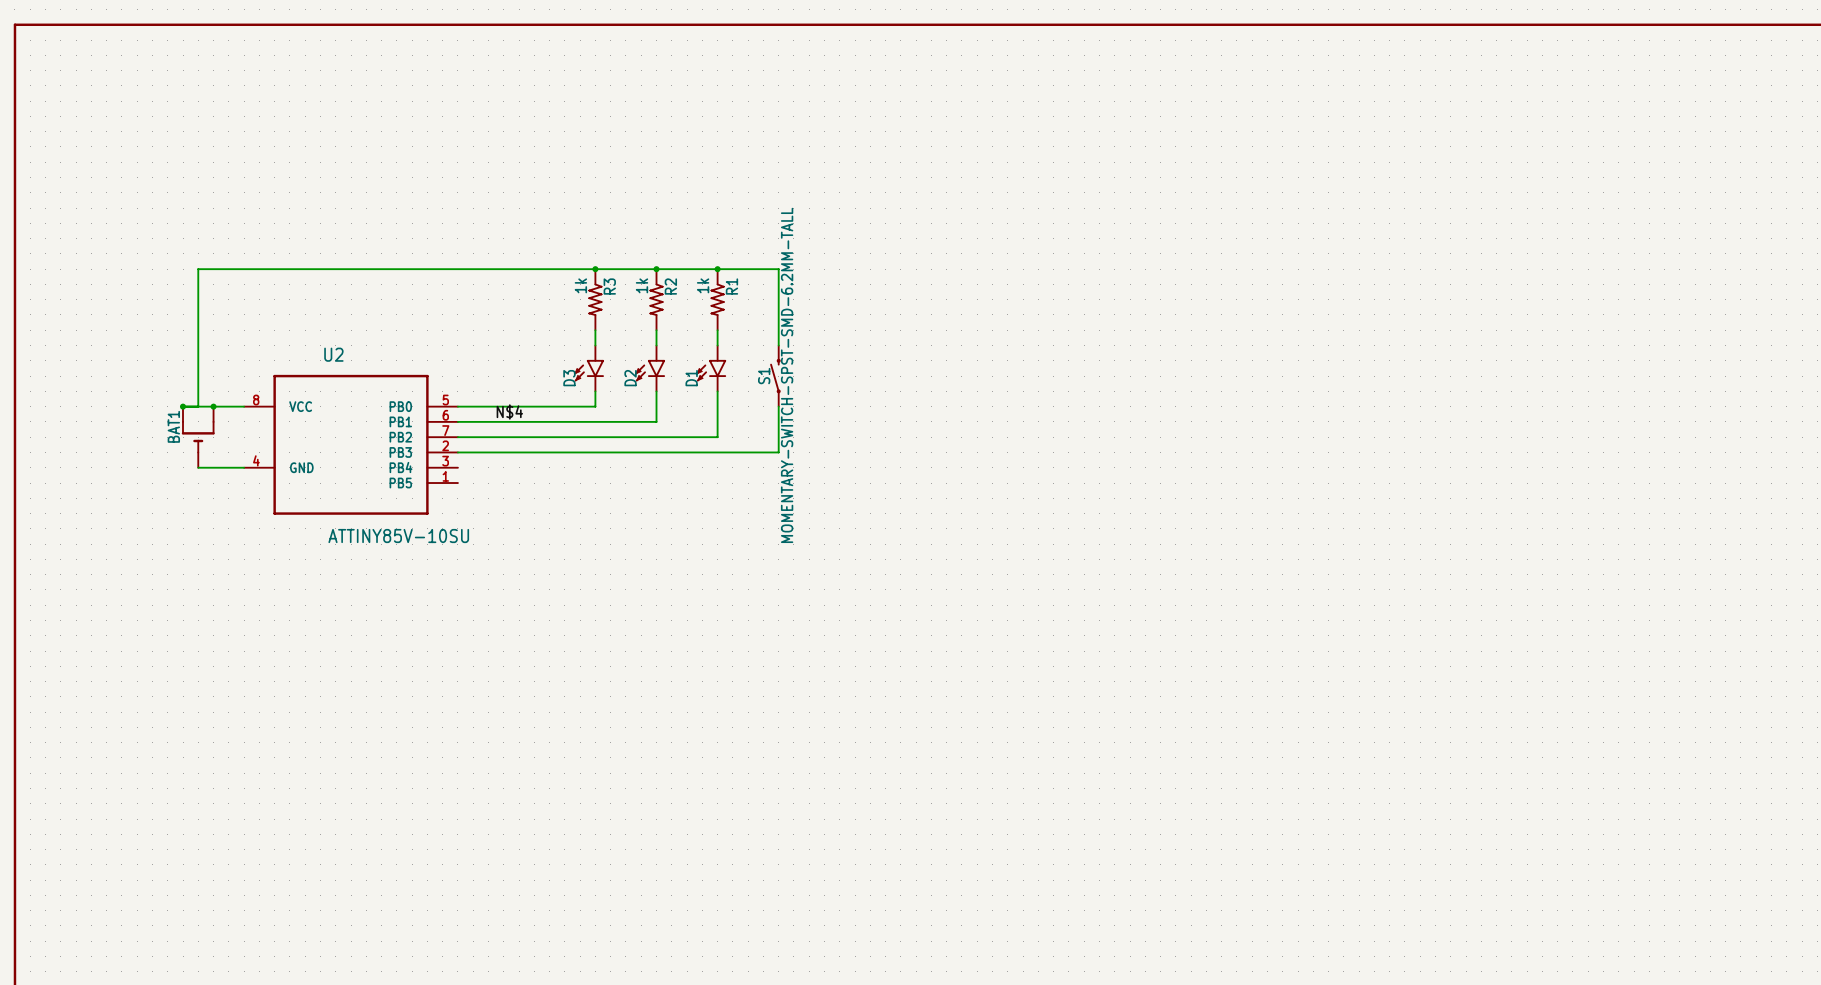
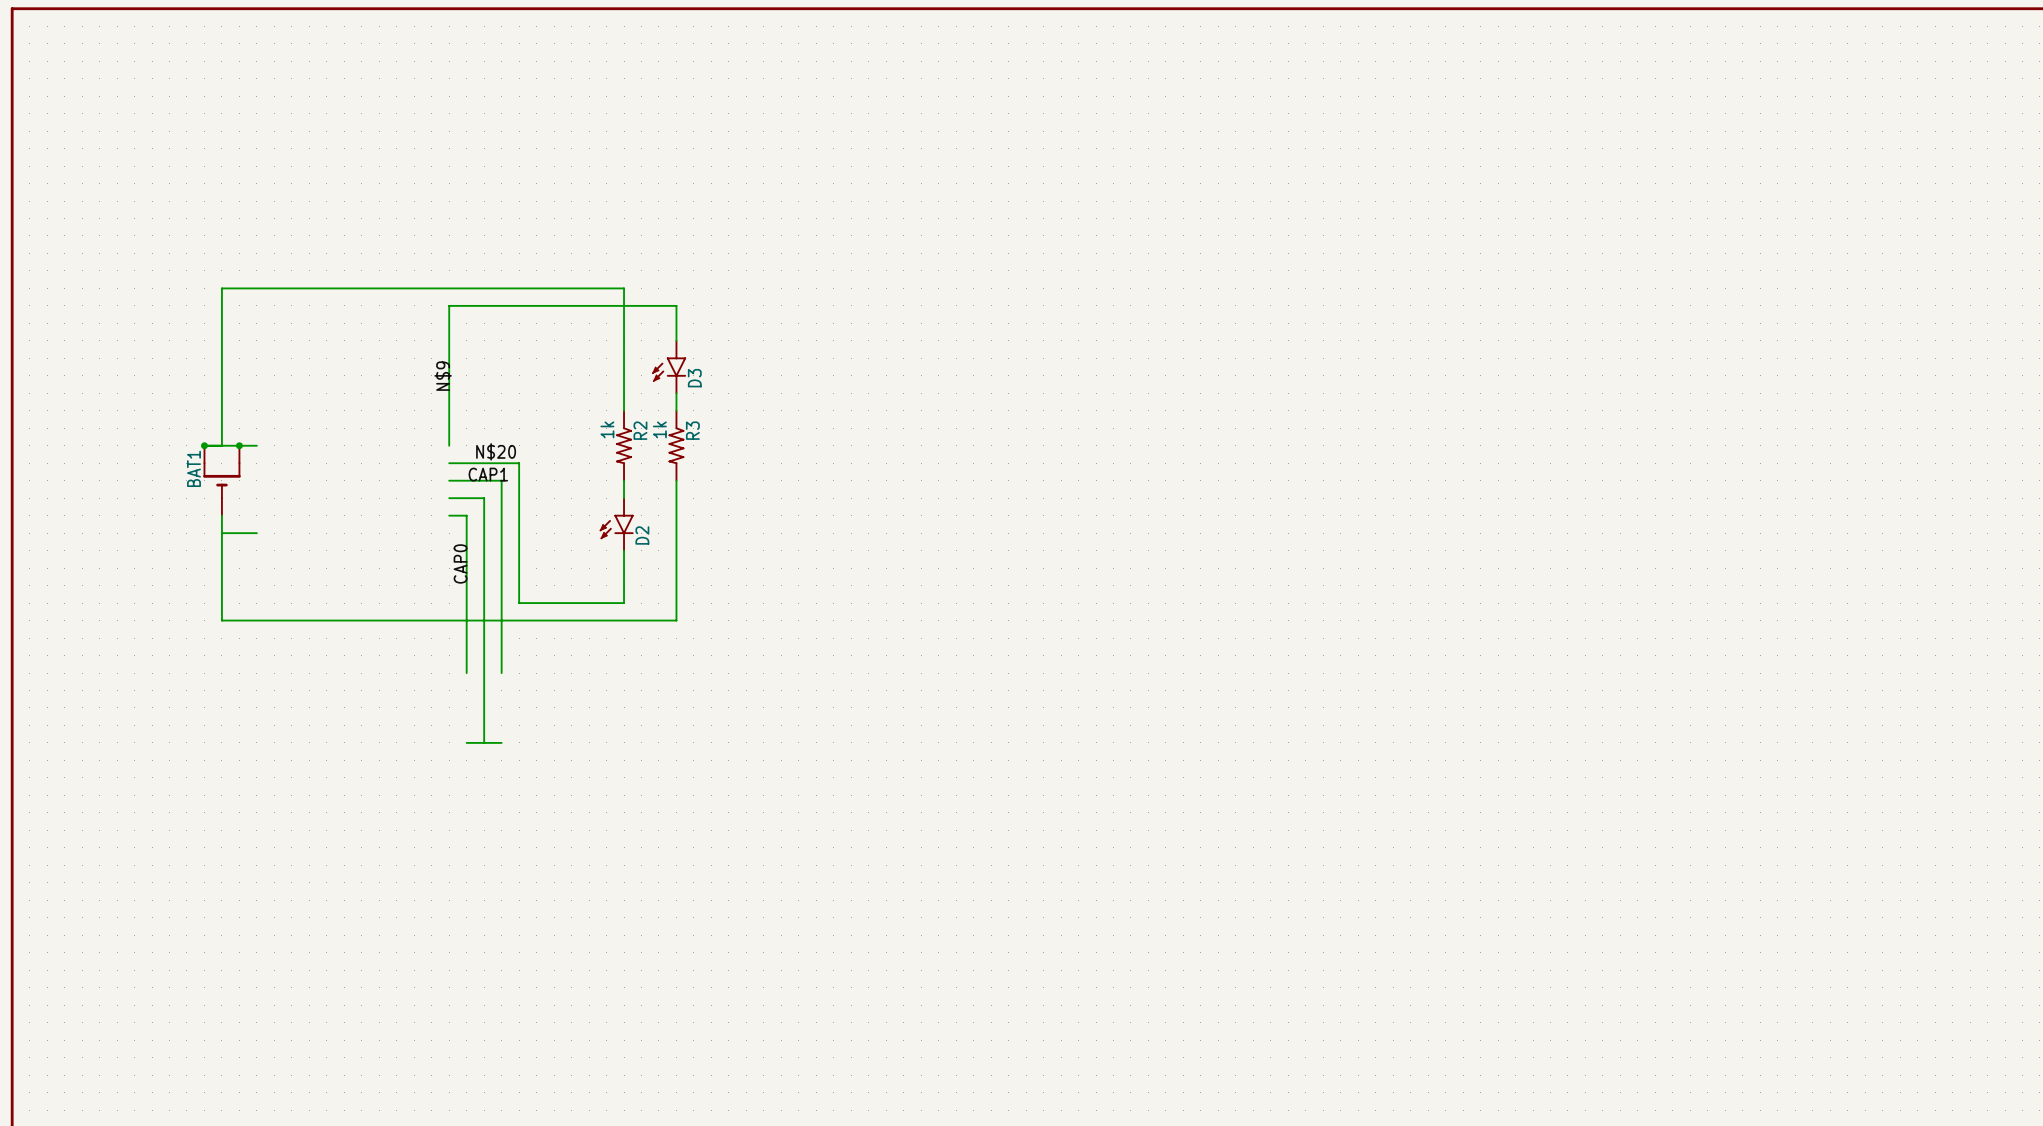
wire: (549, 269) (778, 269) (778, 345) -> (624, 288) (624, 410)
R3 symbol: [588, 269, 603, 331] -> [668, 410, 684, 481]
junction: (595, 269) -> none
R2 symbol: [649, 269, 664, 331] -> [616, 410, 632, 481]
junction: (656, 269) -> none
junction: (717, 269) -> none
R1: 1k (717, 299) -> none
wire: none -> (676, 340) (676, 305) (449, 305) (449, 445)
wire: (595, 330) (595, 345) -> (676, 393) (676, 410)
wire: (656, 330) (656, 345) -> none
wire: (717, 330) (717, 345) -> none
label: none -> N$9 (443, 376)
D3 symbol: [574, 345, 604, 392] -> [652, 340, 687, 394]
D2 symbol: [635, 345, 665, 392] -> [599, 498, 634, 551]
D1: (711, 368) -> none
S1: MOMENTARY-SWITCH-SPST-SMD-6.2MM-TALL (775, 376) -> none
D3 name position: D3 (569, 378) -> D3 (694, 378)
D2 name position: D2 (630, 378) -> D2 (642, 535)
wire: (595, 391) (595, 406) (457, 406) -> none
wire: (656, 391) (656, 421) (457, 421) -> none
wire: (717, 391) (717, 437) (457, 437) -> none
wire: (228, 406) (244, 406) -> none
wire: (778, 406) (778, 452) (457, 452) -> none
label: none -> N$20 (496, 451)
label: N$4 (509, 411) -> none
wire: none -> (449, 463) (519, 463) (519, 603) (624, 603) (624, 550)
label: none -> CAP1 (488, 474)
wire: none -> (449, 480) (501, 480) (501, 673)
wire: none -> (624, 480) (624, 498)
U2: ATTINY85V-10SU (351, 444) -> none
wire: none -> (449, 498) (484, 498) (484, 742)
wire: (198, 467) (244, 467) -> (221, 515) (221, 620) (676, 620) (676, 480)
wire: none -> (449, 515) (466, 515) (466, 673)
wire: none -> (221, 533) (256, 533)
label: none -> CAP0 (460, 563)
wire: none -> (466, 742) (501, 742)

